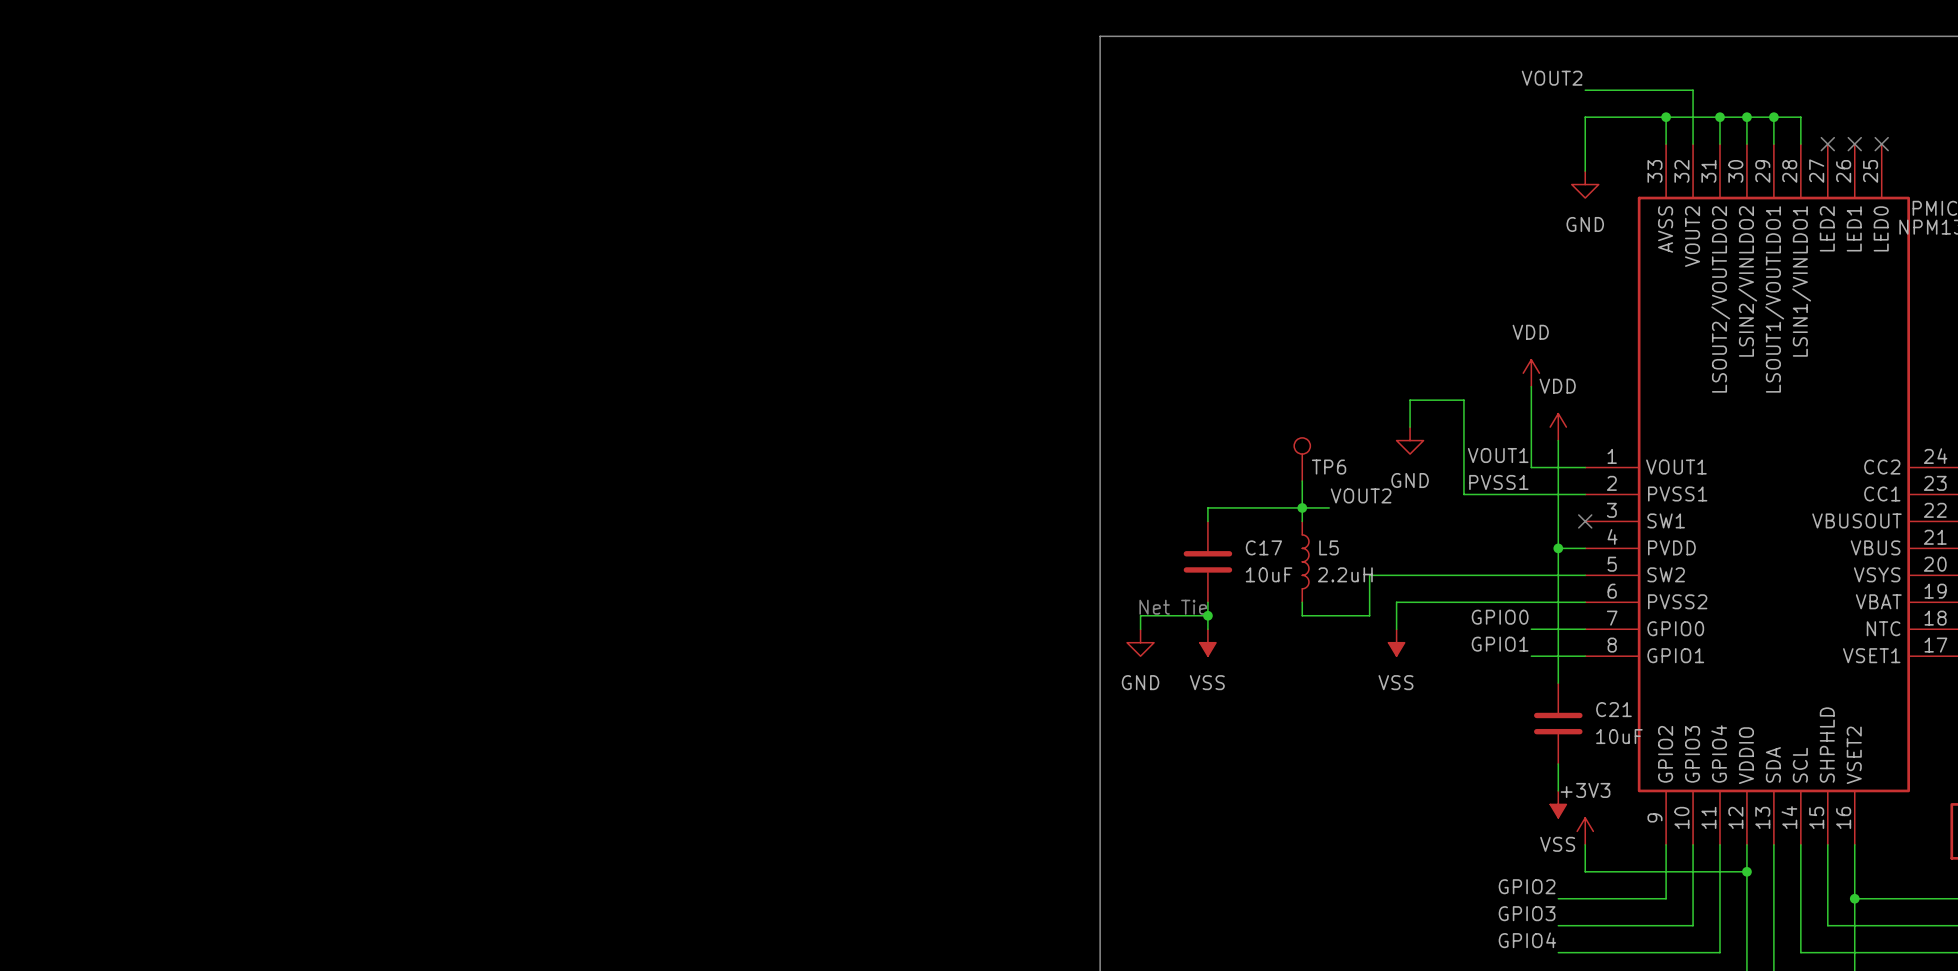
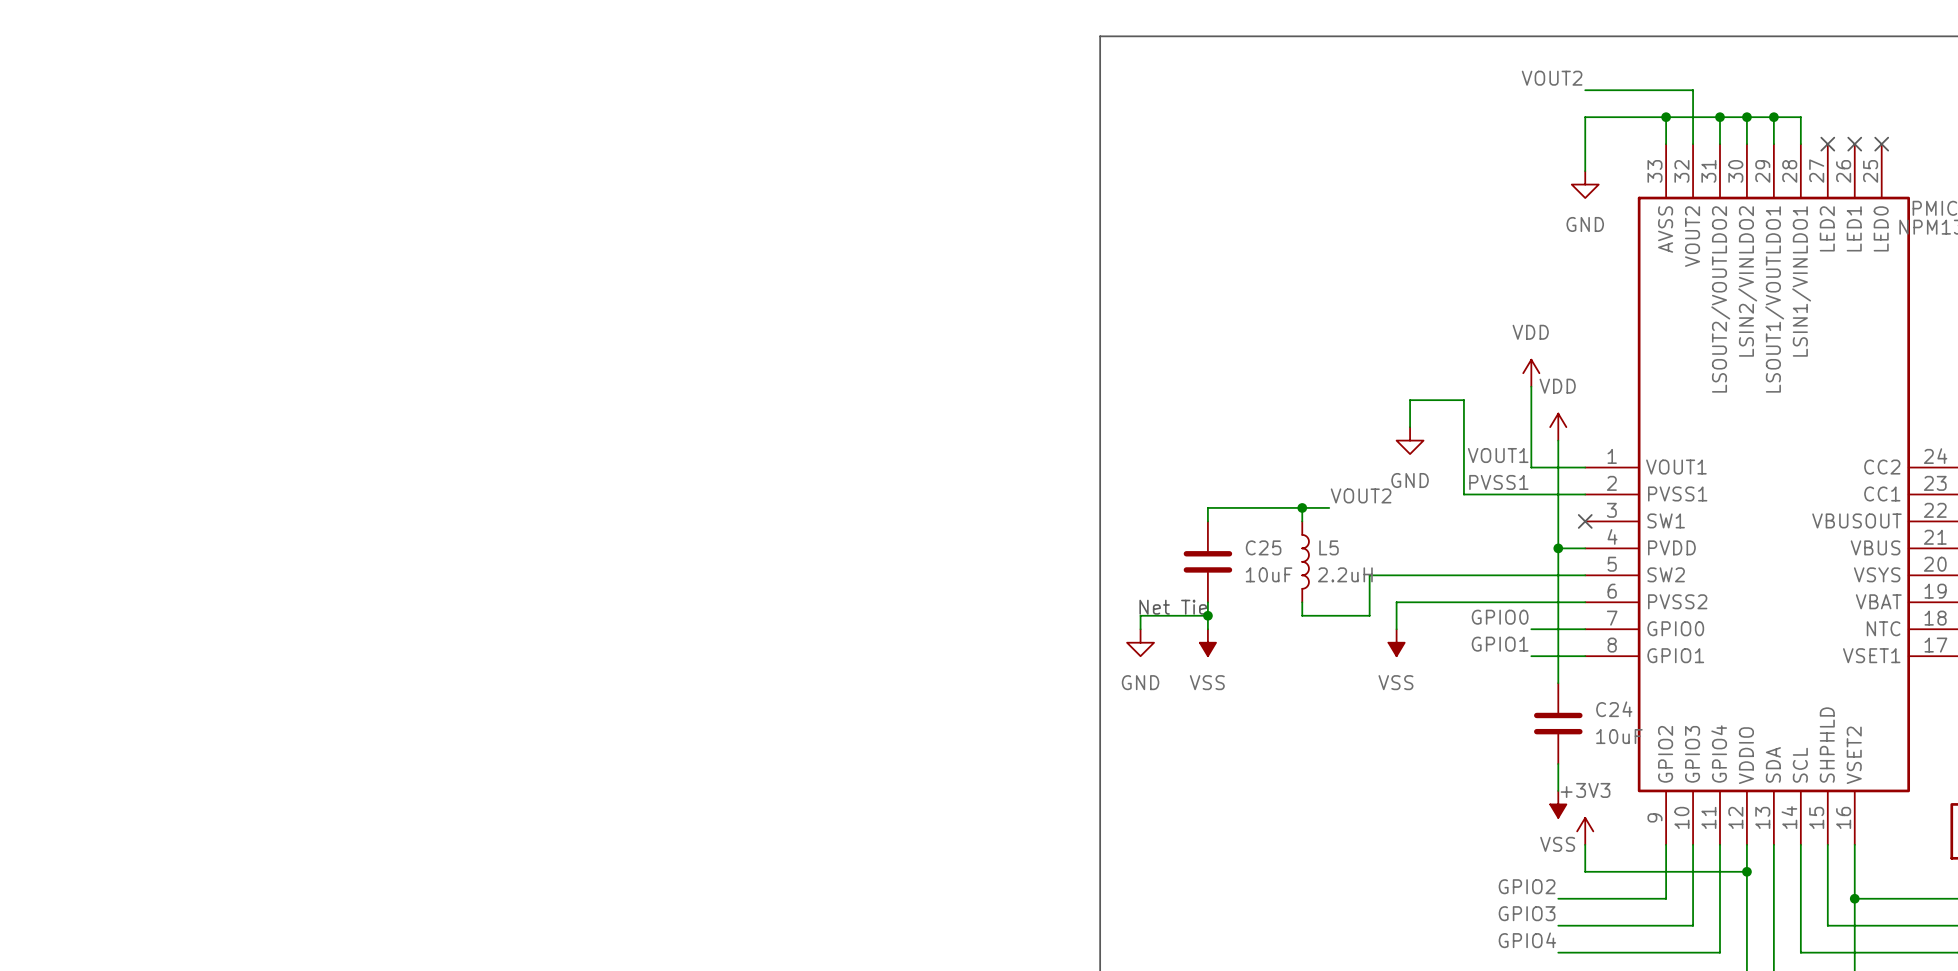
TP6: (1302, 459) -> none
wire: (1302, 481) (1302, 507) -> none
C17 name: C17 (1263, 547) -> C25 (1263, 547)
C21 name: C21 (1613, 709) -> C24 (1614, 709)

